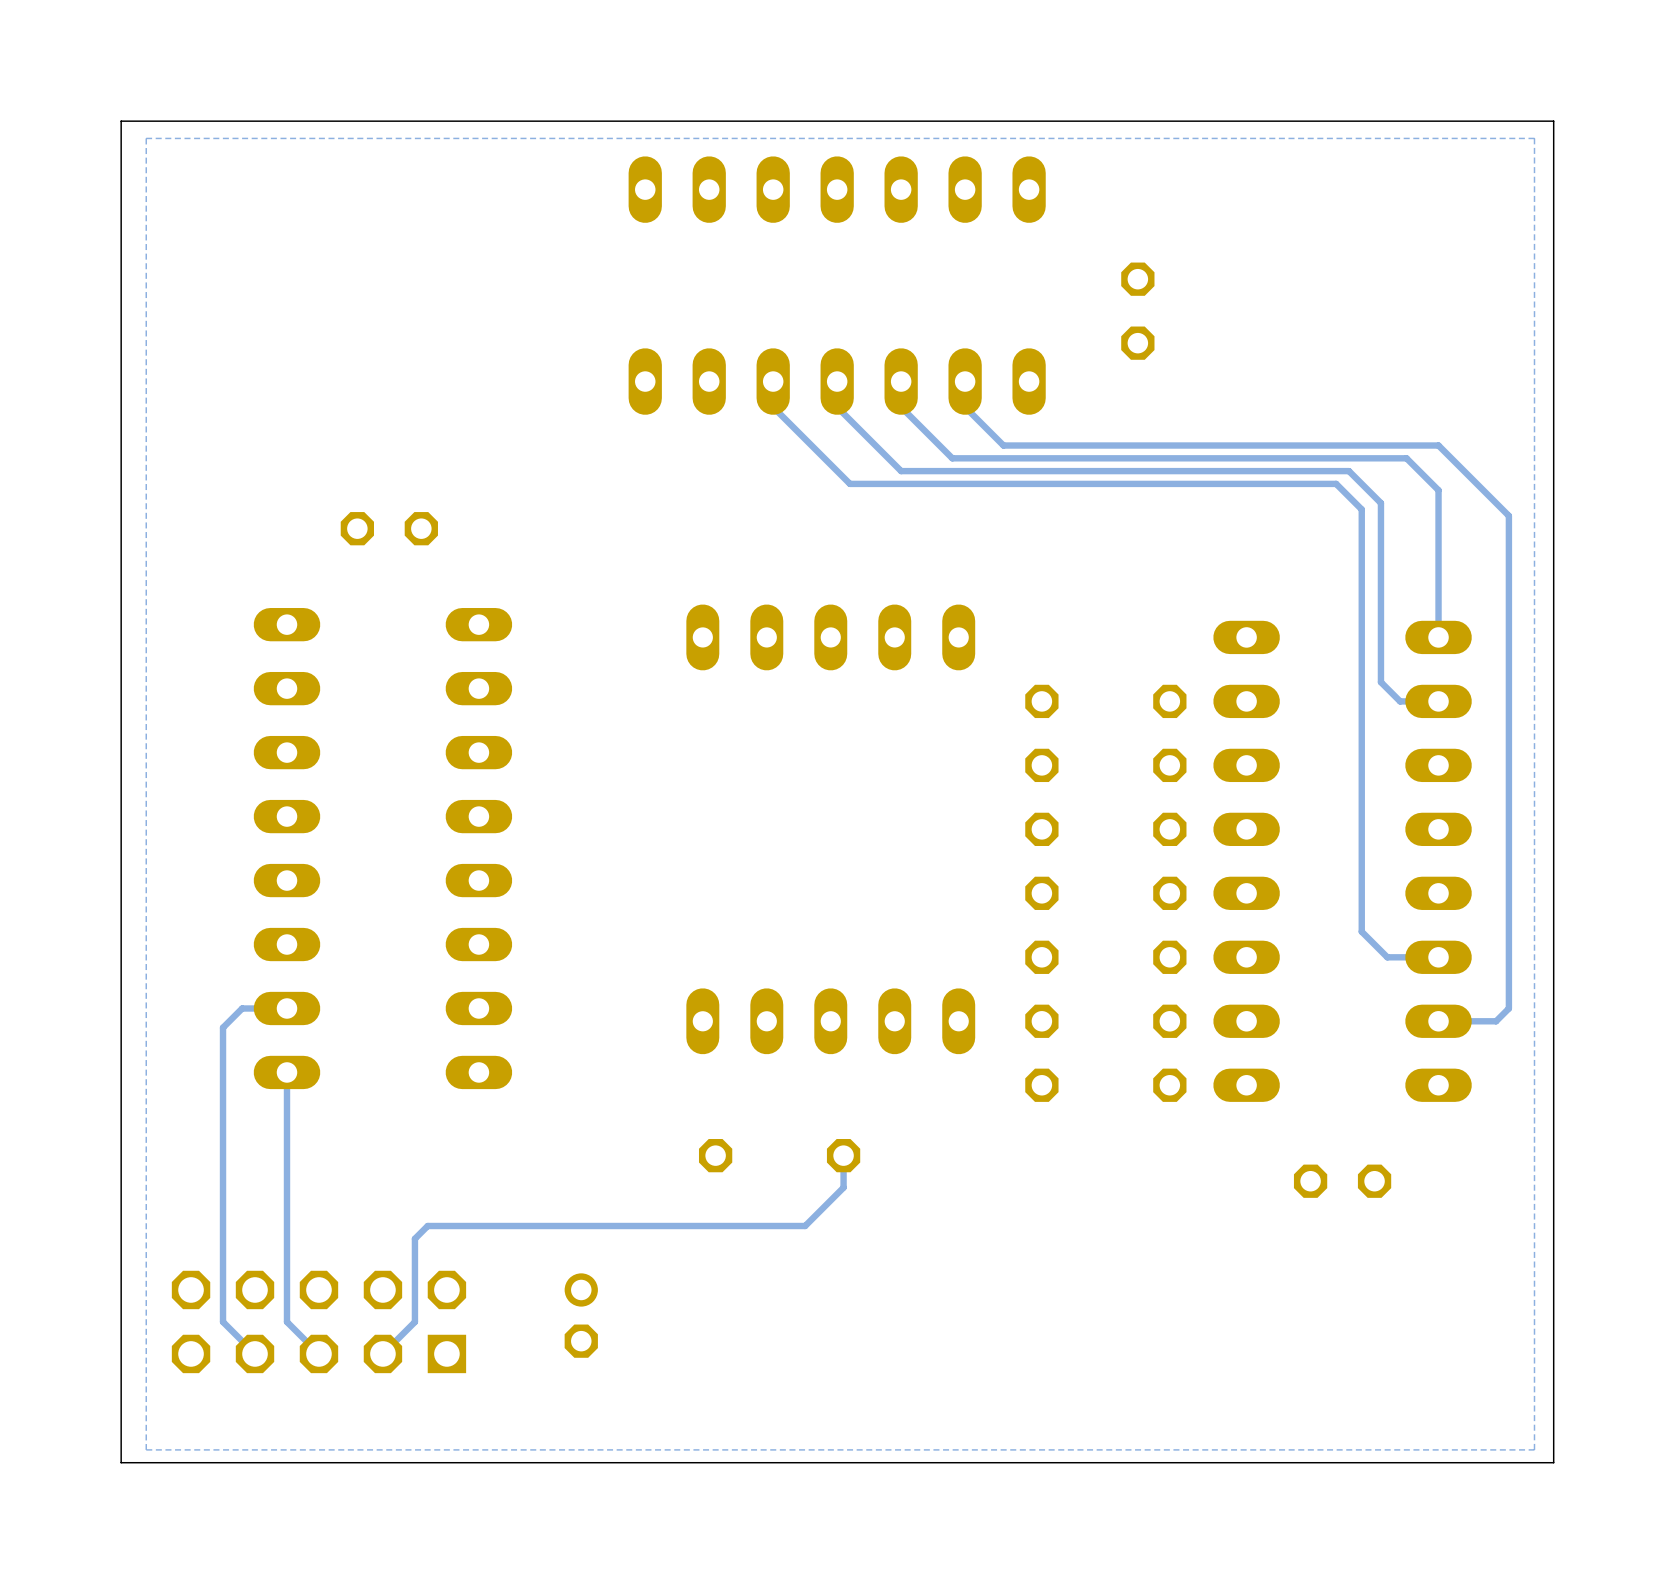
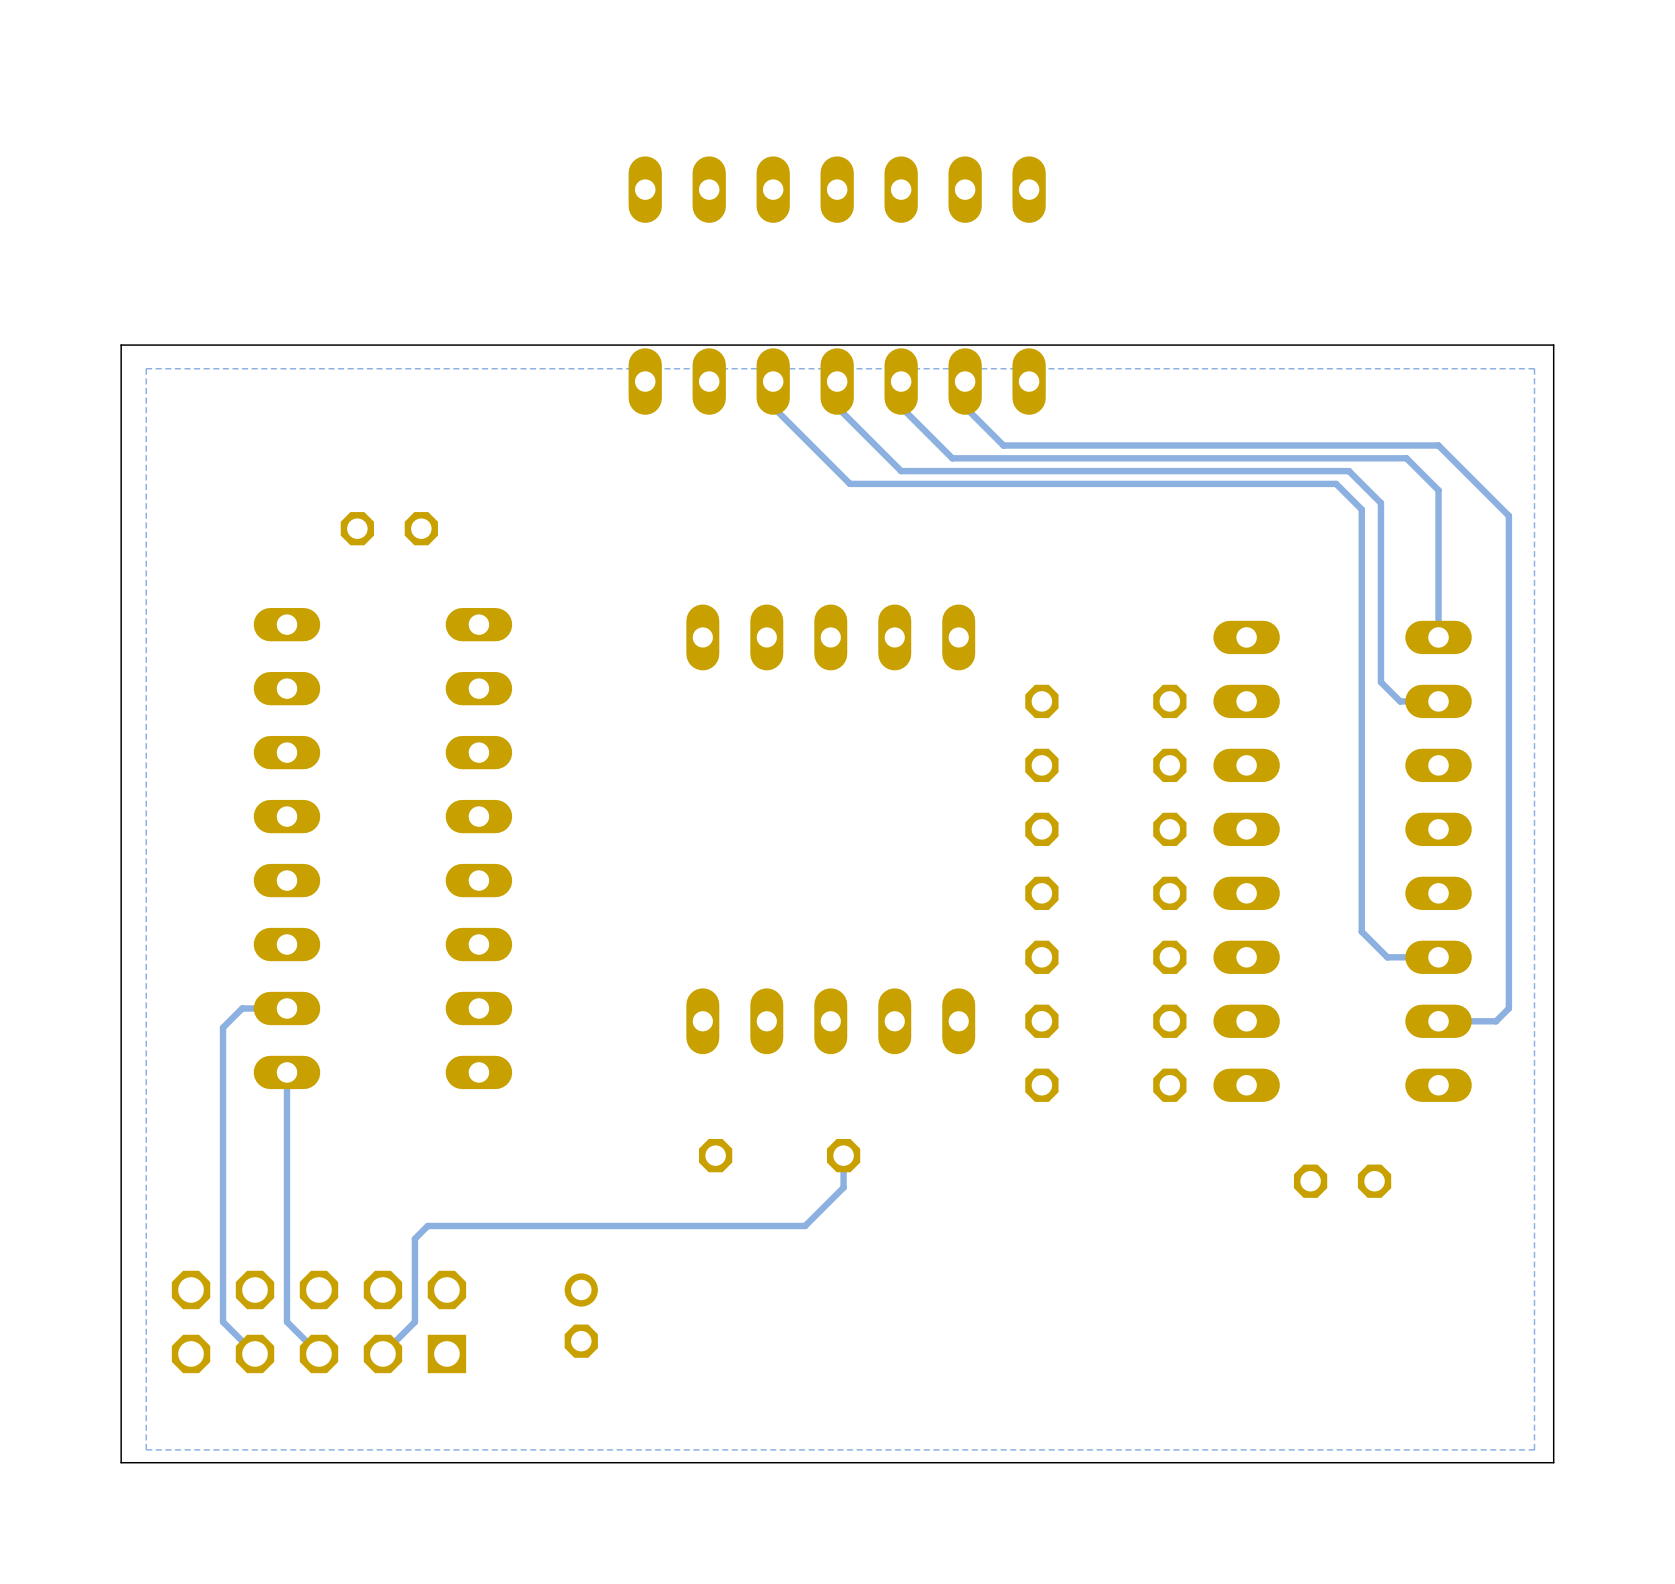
part: (1137, 311) -> none
board edge: (1553, 345) (1553, 121) (121, 121) (121, 345) -> (1553, 345) (121, 345)
zone outline: (1534, 368) (1534, 138) (146, 138) (146, 368) -> (1534, 368) (146, 368)

